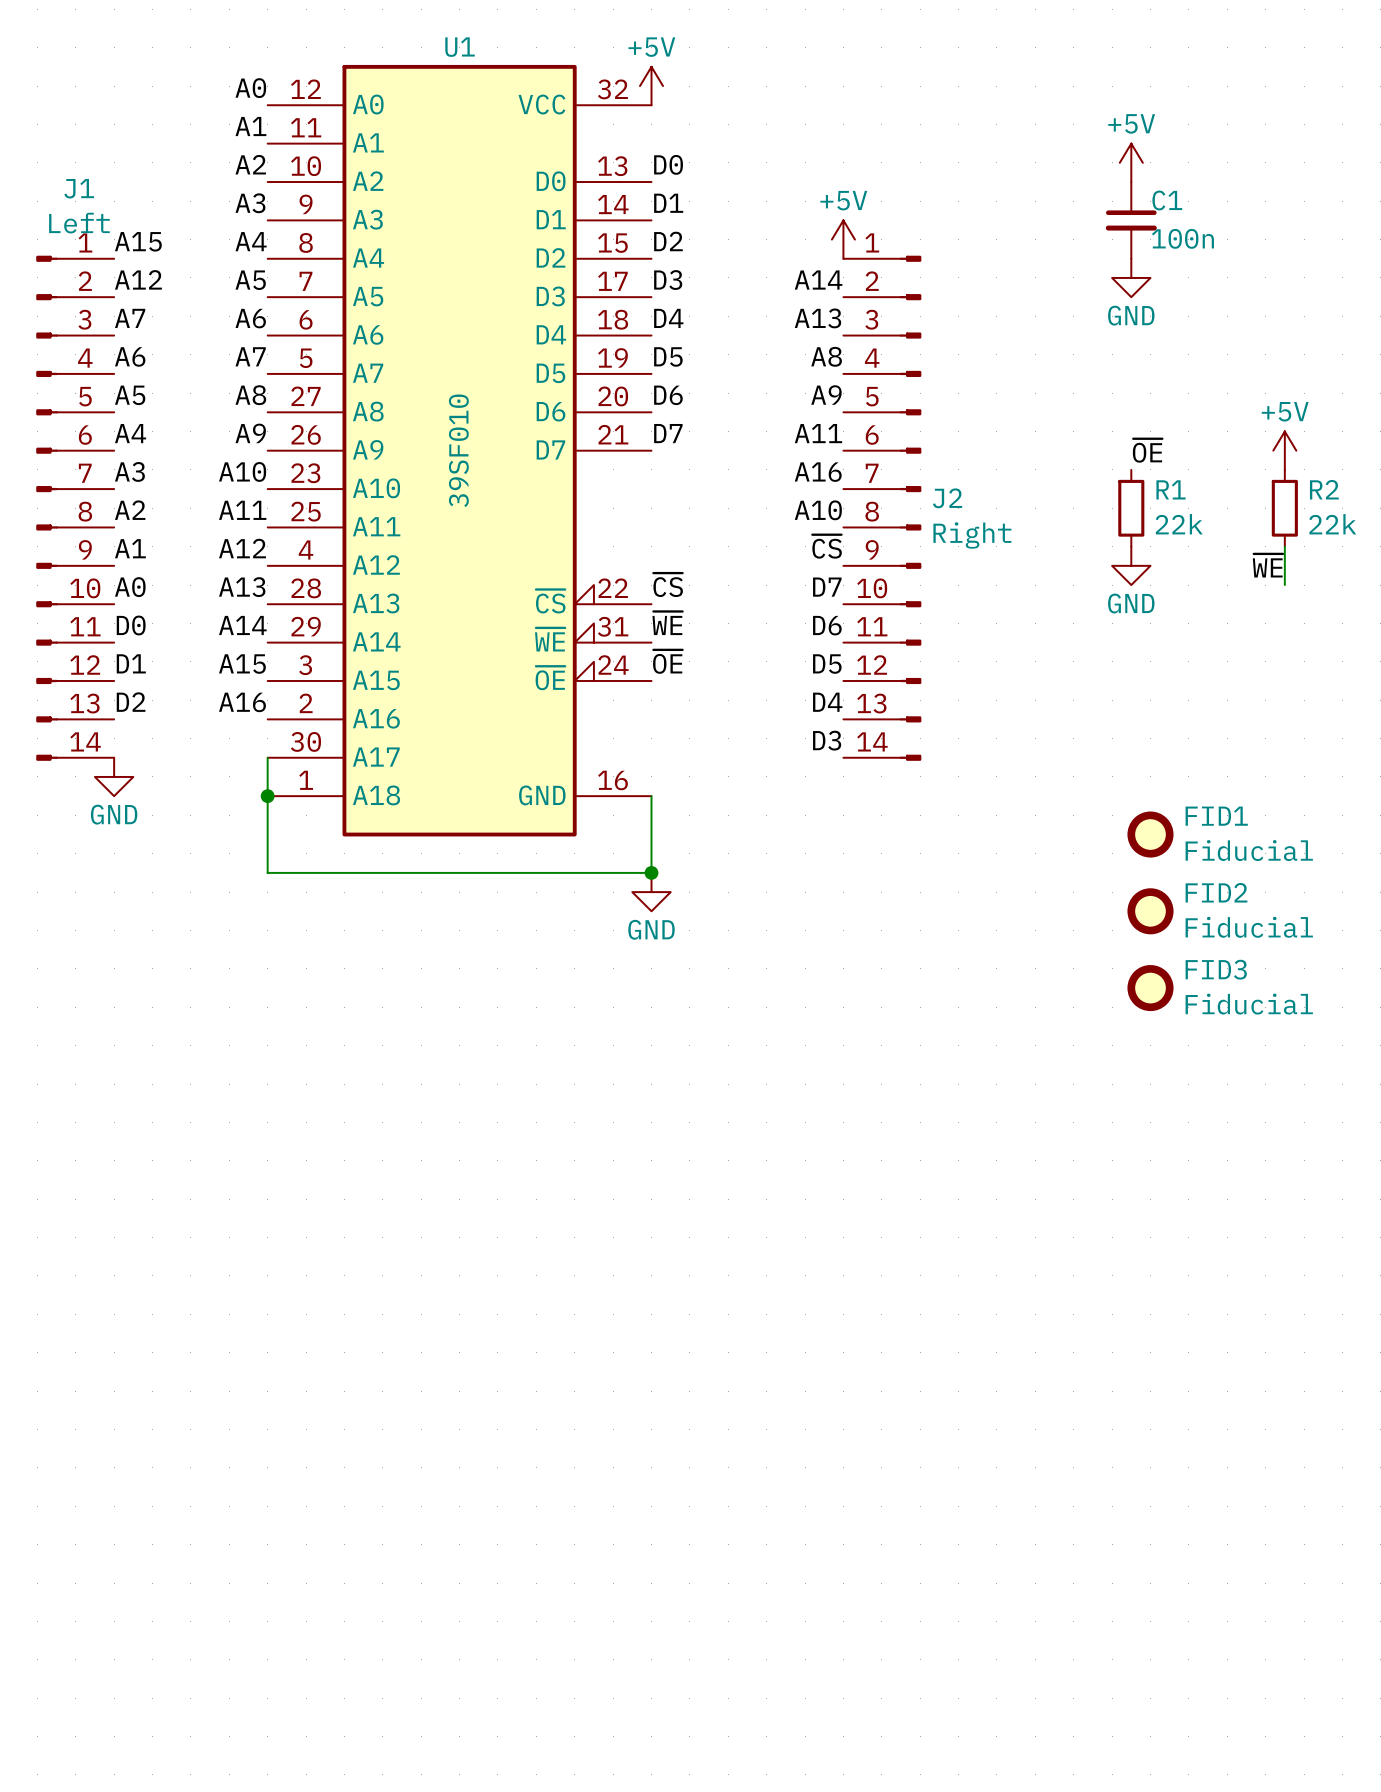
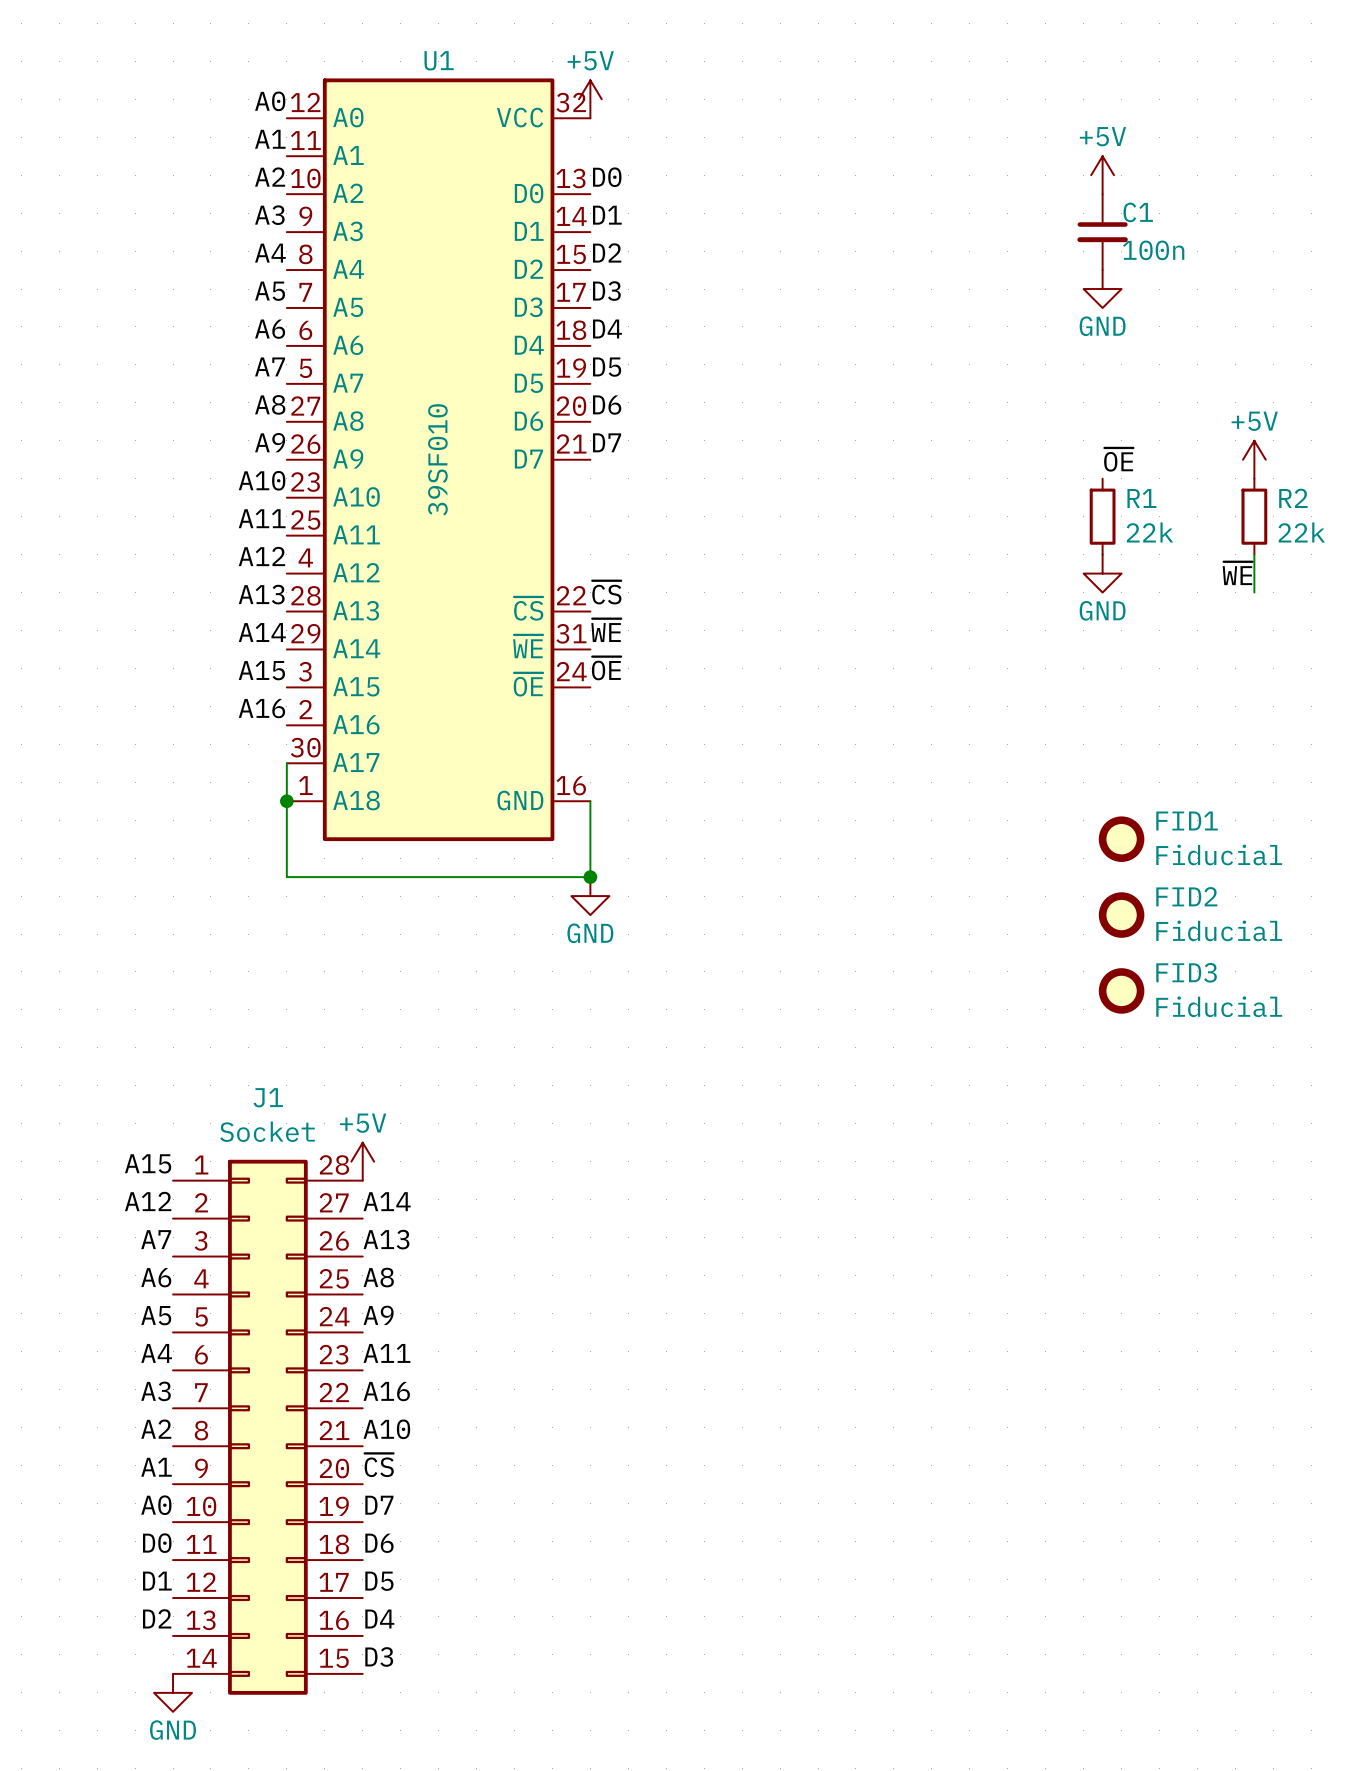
U1 symbol: [267, 64, 652, 837] -> [286, 78, 591, 842]
power symbol position: +5V (651, 86) -> +5V (590, 99)
label position: A0 (250, 88) -> A0 (270, 101)
label position: A1 (250, 126) -> A1 (270, 139)
label position: A2 (250, 164) -> A2 (270, 177)
label position: D0 (668, 164) -> D0 (607, 177)
label position: A3 (250, 203) -> A3 (269, 215)
label position: D1 (668, 203) -> D1 (607, 215)
J1 value: Left (79, 223) -> Socket (267, 1131)
power symbol: +5V (843, 239) -> none
label: A15 (138, 241) -> none
label position: A4 (251, 241) -> A4 (270, 253)
label position: D2 (668, 241) -> D2 (607, 252)
J1 symbol: [36, 255, 115, 761] -> [173, 1159, 363, 1695]
label: A12 (138, 279) -> none
label position: A5 (250, 280) -> A5 (270, 291)
label position: D3 (668, 280) -> D3 (606, 291)
label: A14 (818, 280) -> none
label: A7 (130, 318) -> none
label position: A6 (250, 318) -> A6 (270, 329)
label position: D4 (668, 318) -> D4 (607, 329)
label: A13 (817, 318) -> none
label: A6 (130, 356) -> none
label position: A7 (250, 356) -> A7 (270, 366)
label position: D5 (668, 356) -> D5 (607, 367)
label: A8 (826, 356) -> none
label: A5 (130, 395) -> none
label position: A8 (250, 395) -> A8 (270, 404)
label position: D6 (668, 395) -> D6 (607, 405)
label: A9 (826, 395) -> none
label: A4 (130, 433) -> none
label position: A9 (250, 433) -> A9 (270, 442)
label position: D7 (668, 433) -> D7 (607, 442)
label: A11 (818, 433) -> none
label: A3 (129, 471) -> none
label position: A10 (242, 471) -> A10 (262, 480)
label: A16 (818, 472) -> none
J2: Right (882, 508) -> none
label: A2 (130, 510) -> none
label position: A11 (242, 510) -> A11 (262, 518)
label: A10 (818, 510) -> none
label: ~{CS} (827, 546) -> none
label: A1 (130, 548) -> none
label position: A12 (242, 548) -> A12 (261, 556)
label position: ~{CS} (668, 585) -> ~{CS} (606, 592)
label: A0 (130, 587) -> none
label position: A13 (242, 587) -> A13 (261, 594)
label: D7 (827, 587) -> none
label position: ~{WE} (667, 623) -> ~{WE} (606, 630)
label: D0 (131, 625) -> none
label position: A14 (242, 625) -> A14 (262, 632)
label: D6 (827, 625) -> none
label position: ~{OE} (667, 661) -> ~{OE} (606, 668)
label: D1 (131, 663) -> none
label position: A15 (242, 664) -> A15 (261, 670)
label: D5 (827, 664) -> none
label: D2 (131, 702) -> none
label position: A16 (242, 702) -> A16 (261, 708)
label: D4 (827, 702) -> none
label: D3 (827, 740) -> none
wire: (267, 757) (267, 872) (306, 872) -> (286, 763) (286, 877)
power symbol: GND (114, 776) -> none
junction position: (267, 796) -> (286, 801)
wire: (651, 796) (651, 872) (613, 872) -> (590, 801) (590, 877)
junction position: (651, 872) -> (590, 877)
power symbol position: GND (651, 892) -> GND (590, 896)
power symbol: none -> +5V (362, 1161)
label: none -> A15 (148, 1163)
label: none -> A12 (148, 1201)
label: none -> A14 (387, 1201)
label: none -> A7 (156, 1239)
label: none -> A13 (386, 1239)
label: none -> A6 (156, 1277)
label: none -> A8 (378, 1277)
label: none -> A5 (156, 1315)
label: none -> A9 (378, 1315)
label: none -> A4 (156, 1353)
label: none -> A11 (386, 1353)
label: none -> A3 (156, 1391)
label: none -> A16 (386, 1391)
label: none -> A2 (156, 1429)
label: none -> A10 (386, 1429)
label: none -> ~{CS} (379, 1465)
label: none -> A1 (156, 1467)
label: none -> A0 (156, 1505)
label: none -> D7 (379, 1505)
label: none -> D0 (157, 1543)
label: none -> D6 (379, 1543)
label: none -> D1 (157, 1581)
label: none -> D5 (379, 1581)
label: none -> D2 (157, 1618)
label: none -> D4 (379, 1619)
label: none -> D3 (379, 1656)
power symbol: none -> GND (173, 1692)

